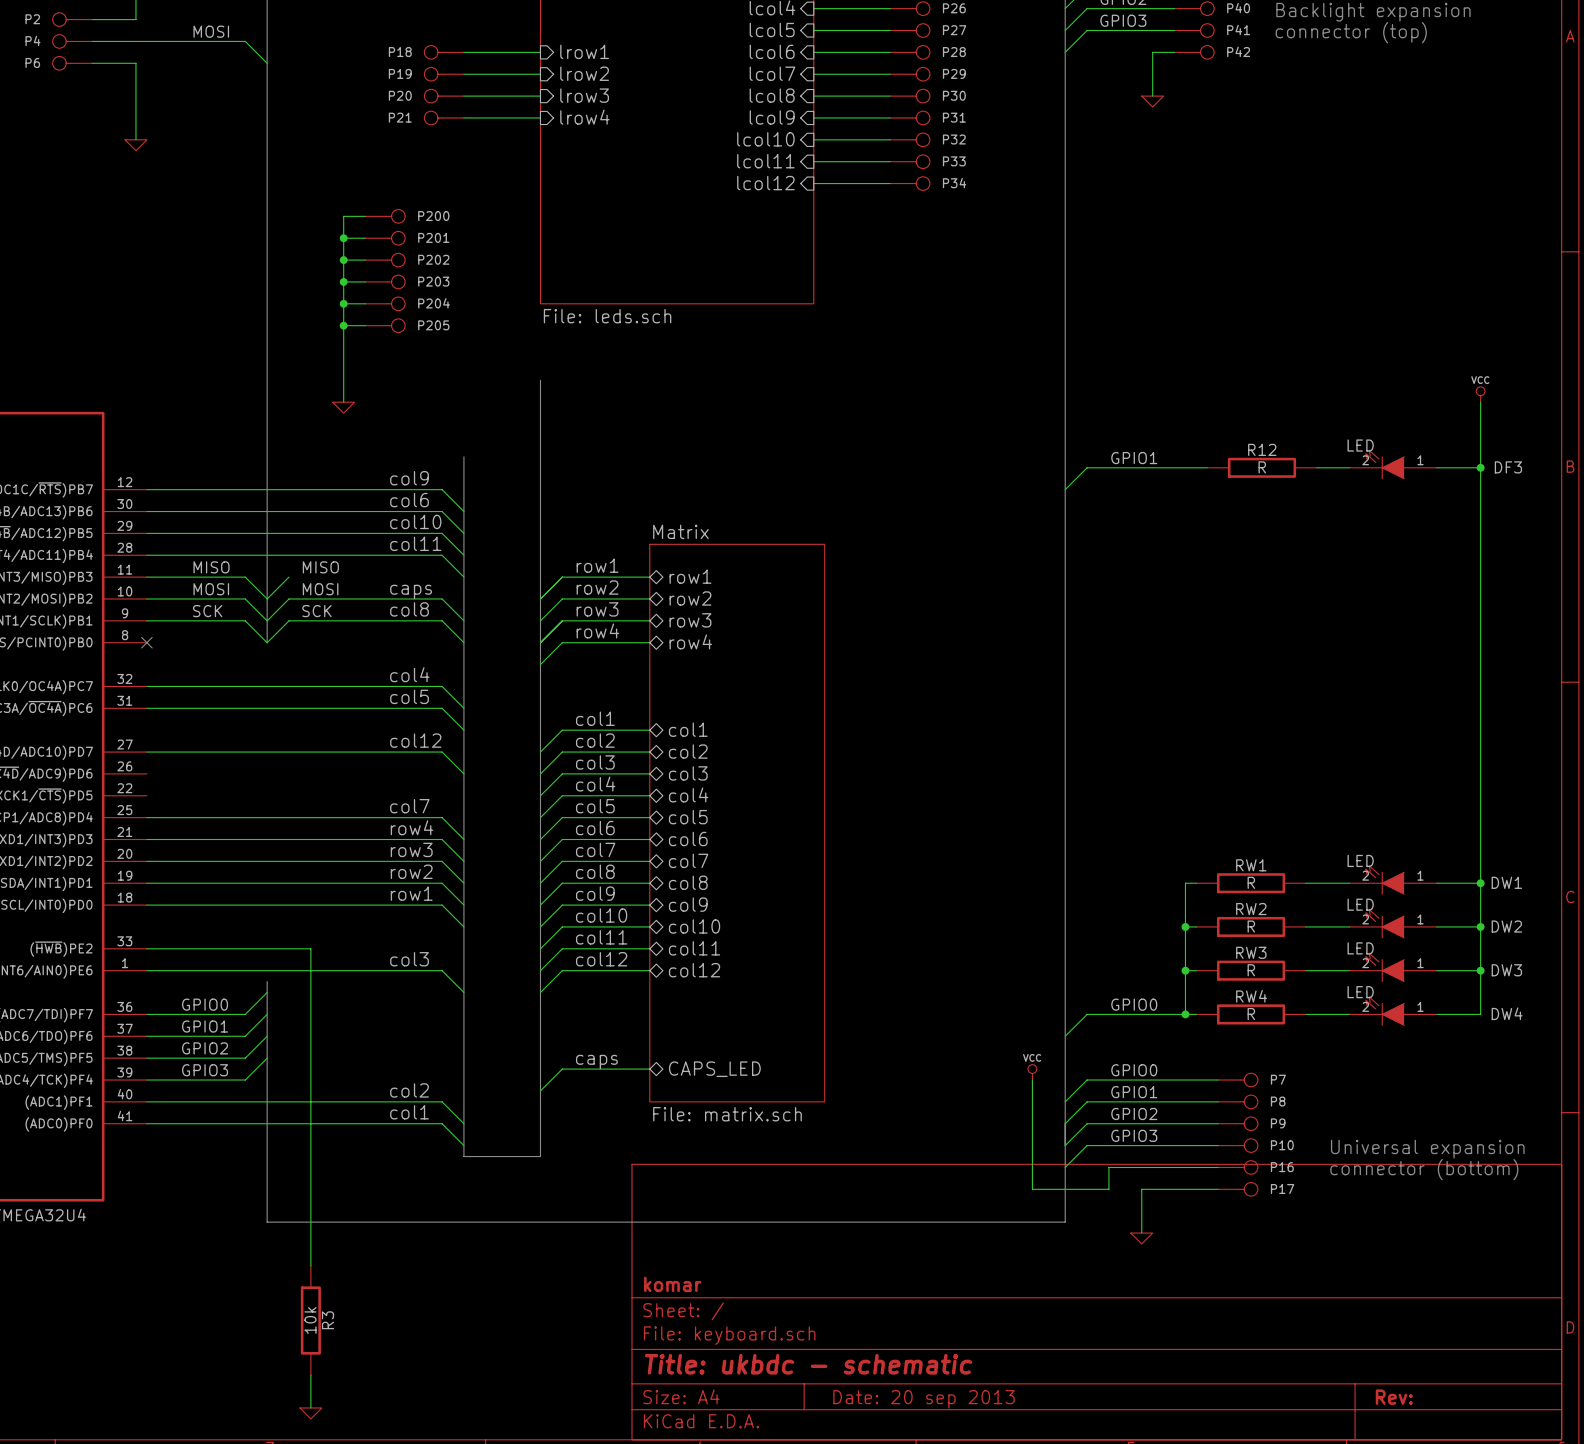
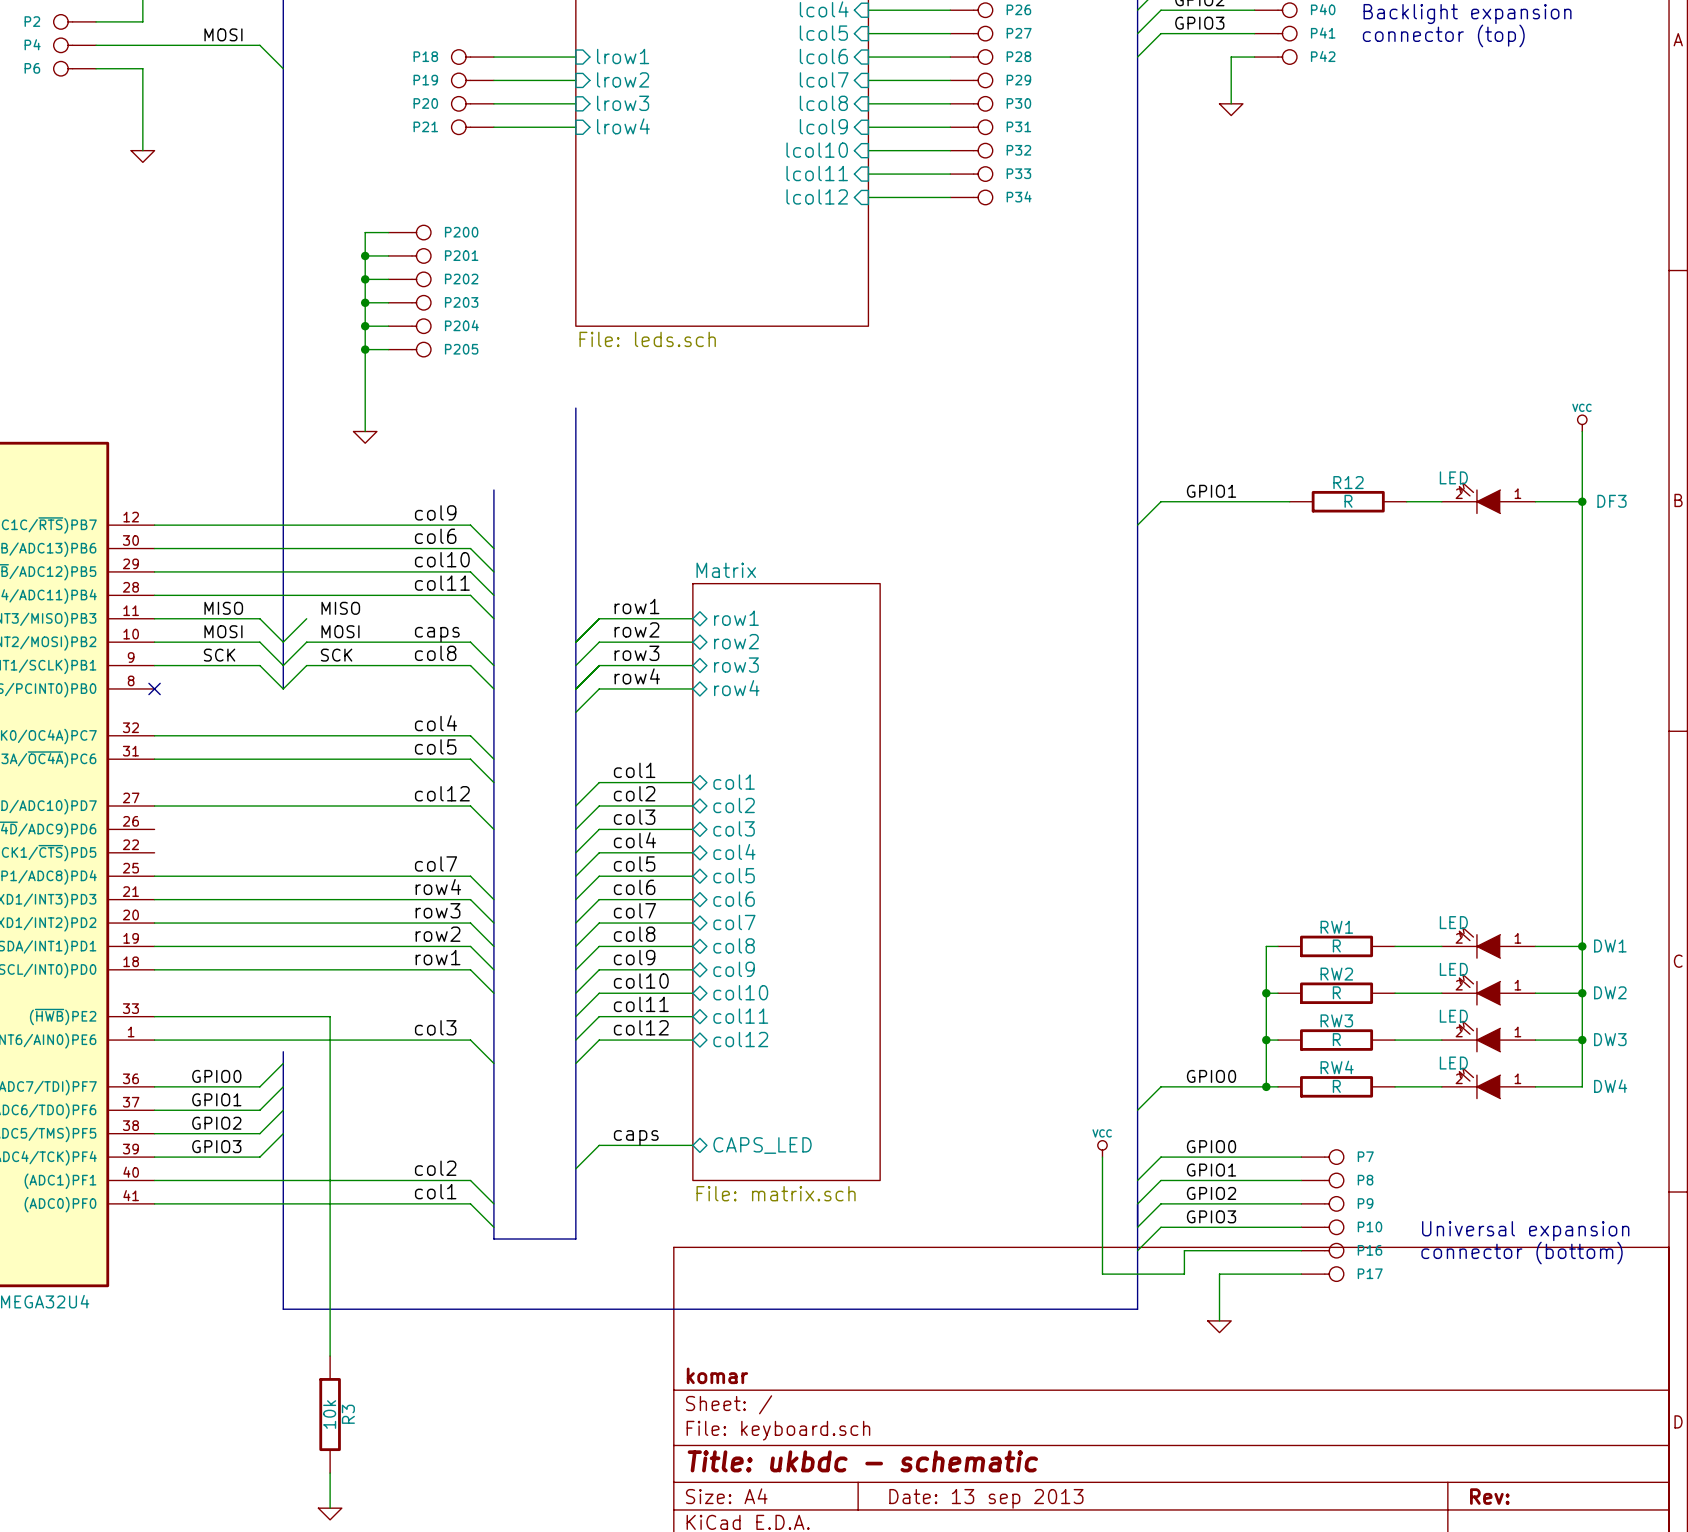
title block: Date: 20 sep 2013 (923, 1399) -> Date: 13 sep 2013 (986, 1498)

